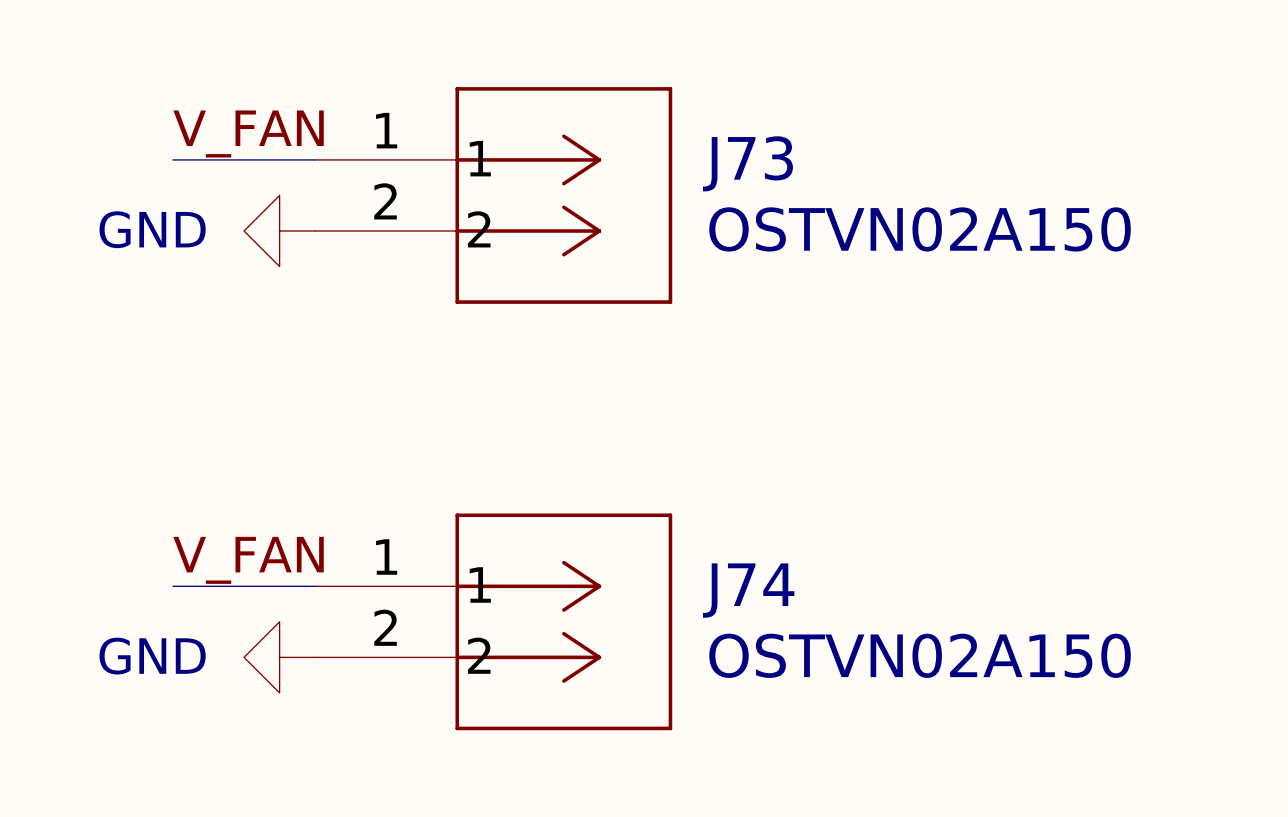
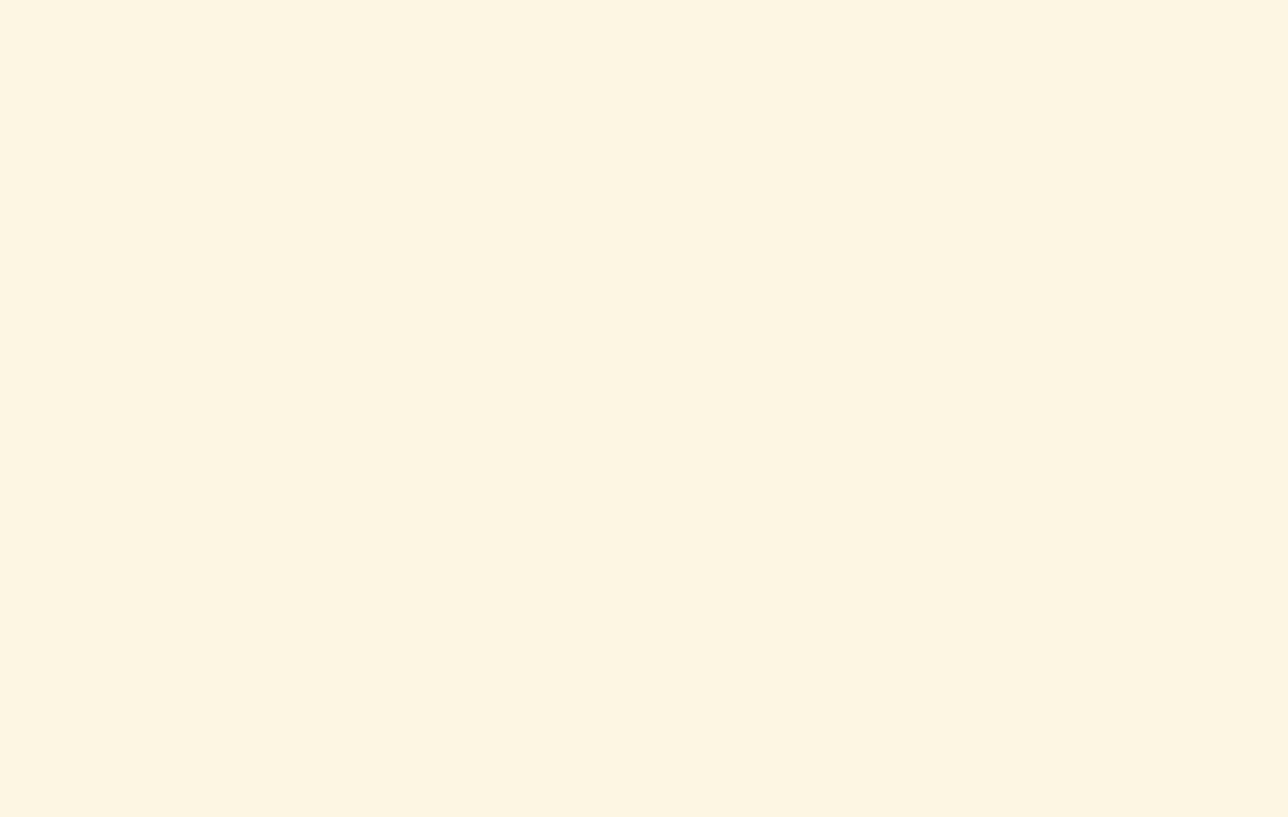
label: V_FAN (248, 133) -> none
wire: (173, 159) (315, 159) -> none
J73: OSTVN02A150 (493, 195) -> none
power symbol: GND (279, 231) -> none
label: V_FAN (248, 560) -> none
wire: (173, 586) (315, 586) -> none
J74: OSTVN02A150 (493, 621) -> none
power symbol: GND (279, 657) -> none

